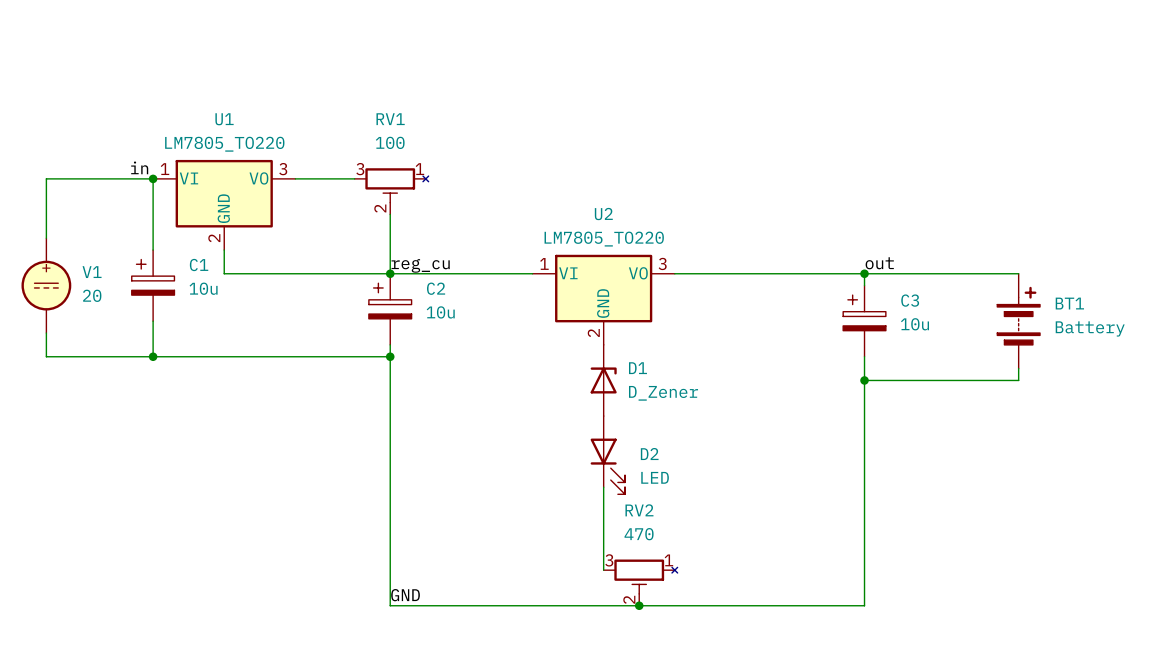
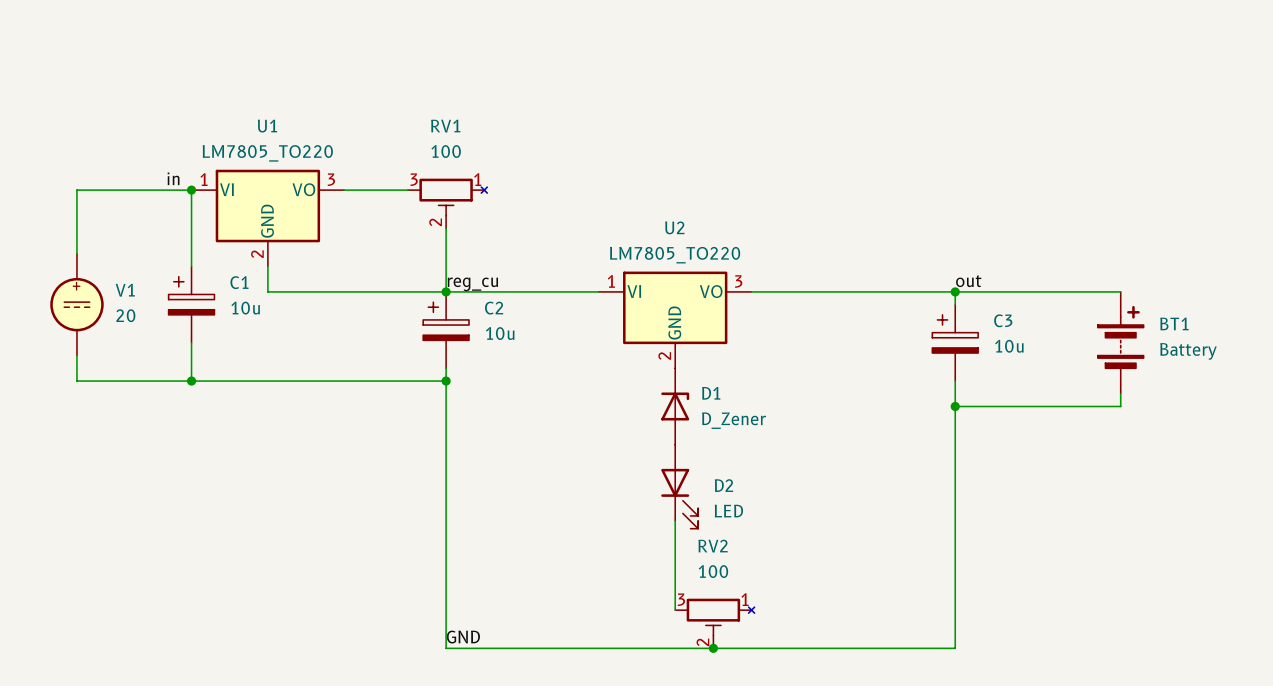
RV2 value: 470 (639, 534) -> 100 (713, 571)

